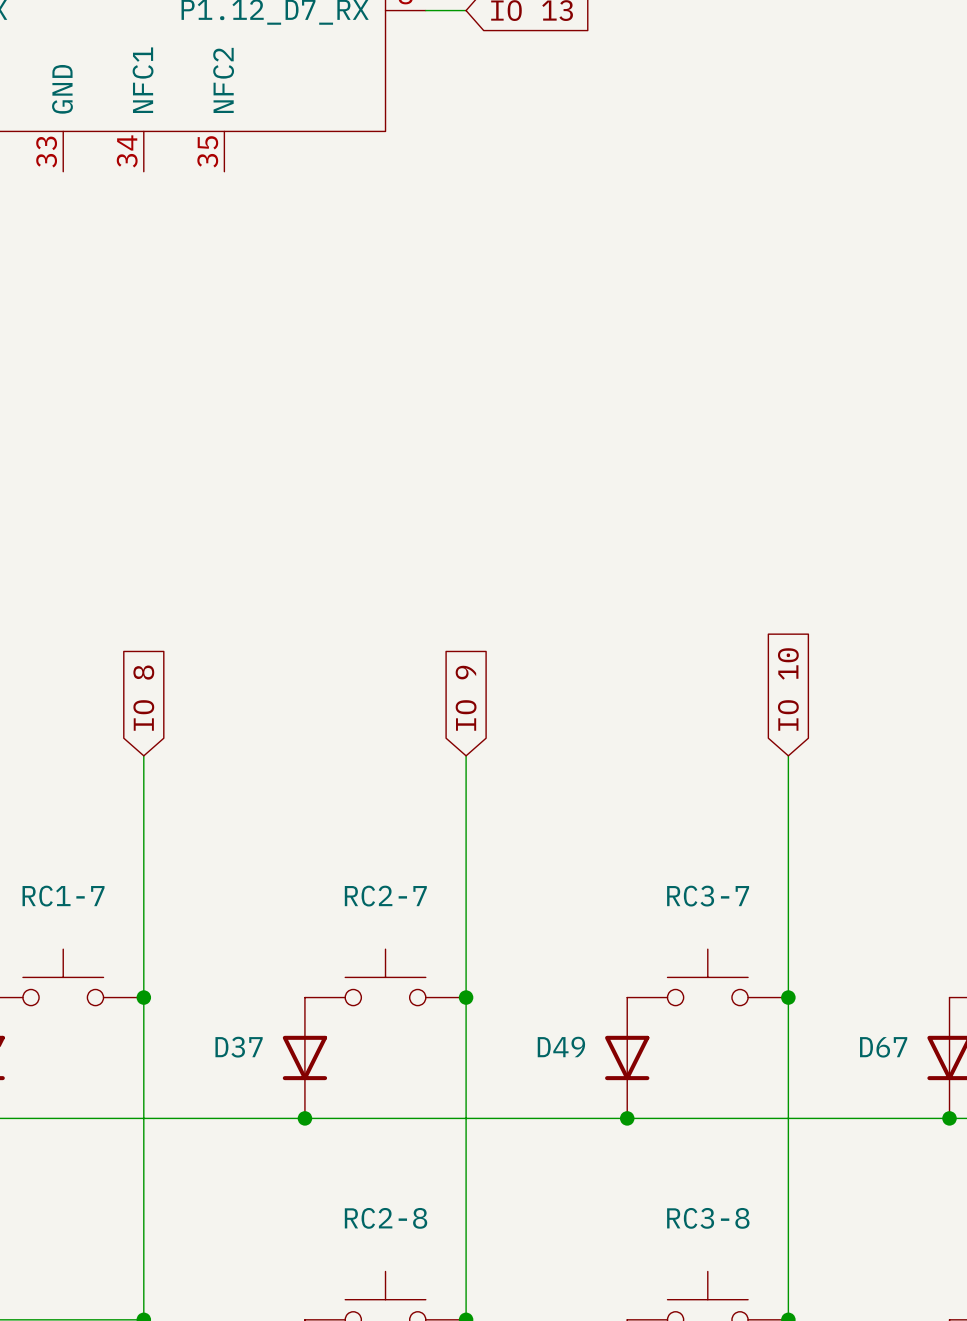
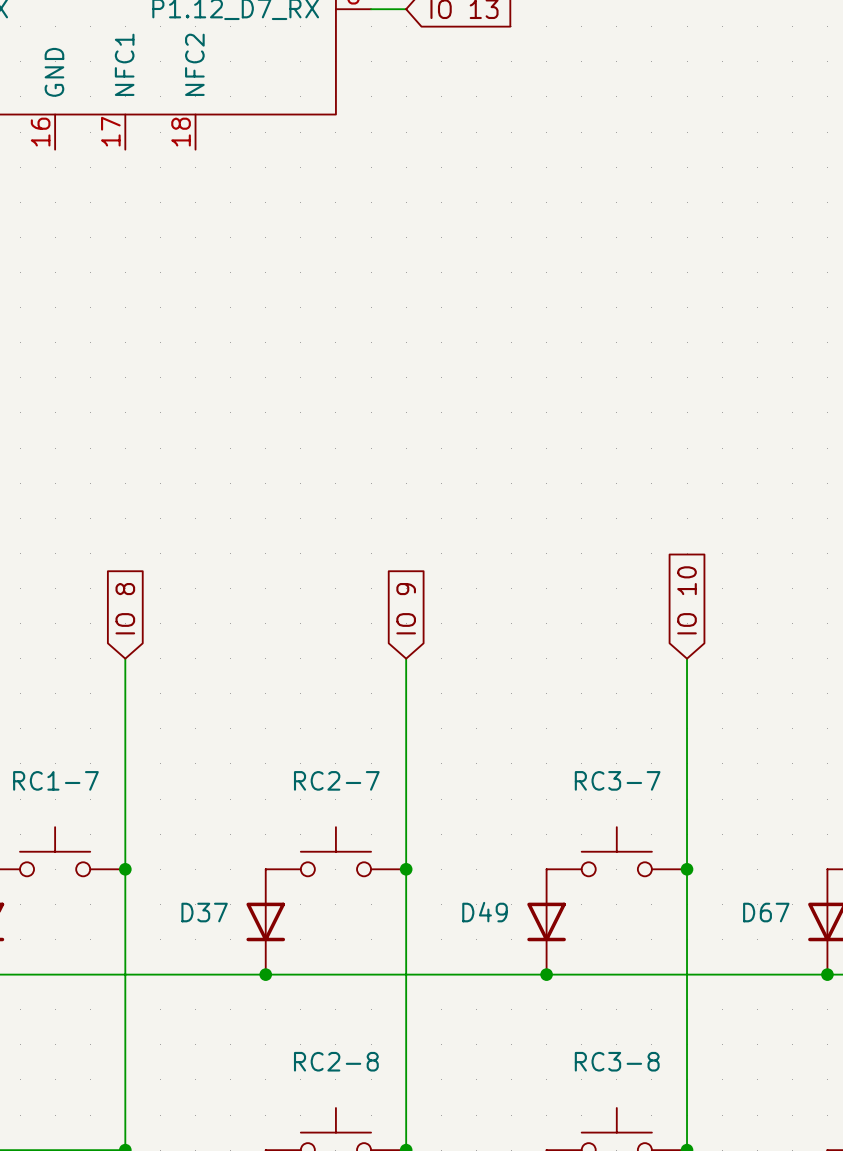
part pin number: 34 (127, 151) -> 17 (110, 131)
part pin number: 35 (207, 151) -> 18 (181, 132)
part pin number: 33 (46, 152) -> 16 (40, 132)

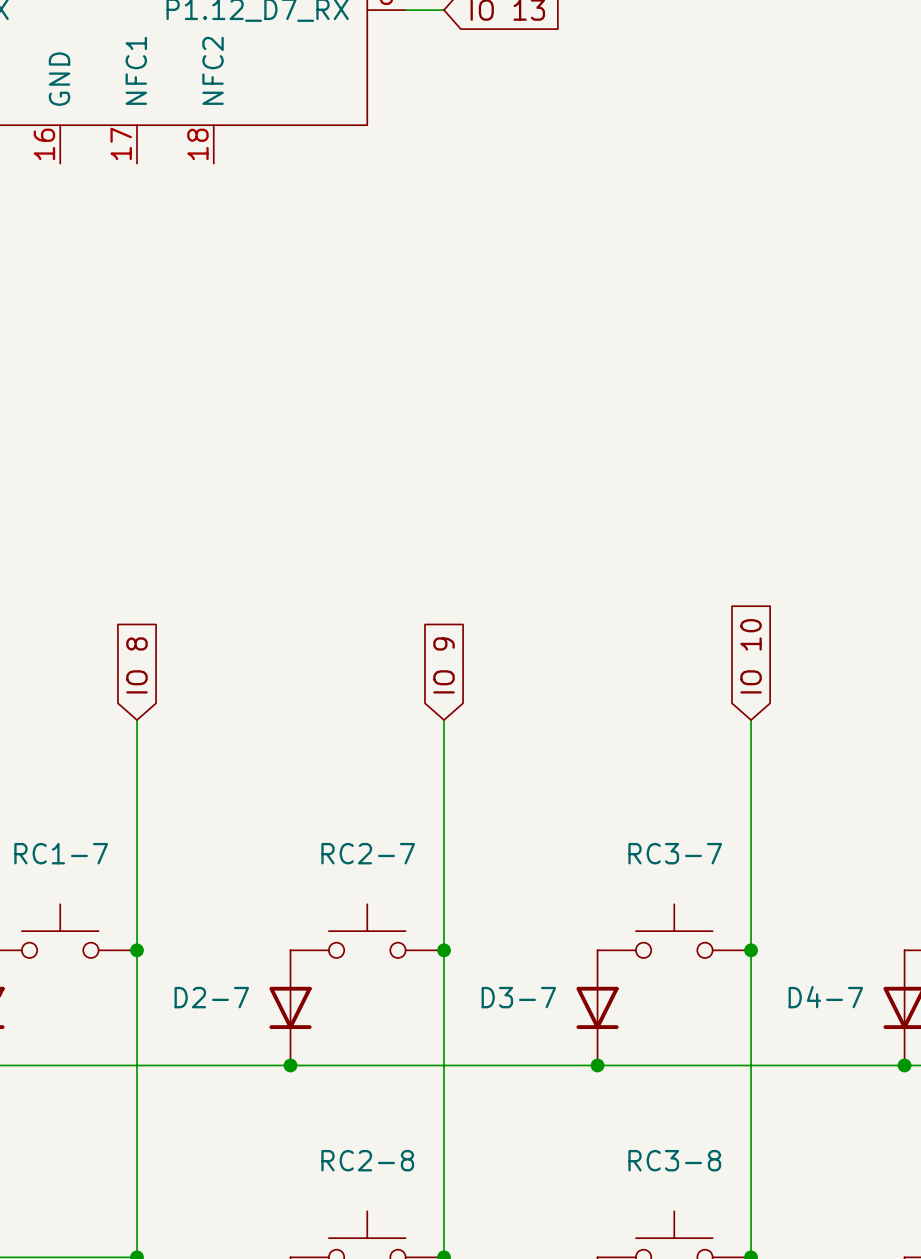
D37 name: D37 (204, 912) -> D2-7 (211, 997)
D49 name: D49 (485, 912) -> D3-7 (518, 997)
D67 name: D67 (766, 912) -> D4-7 (825, 997)

